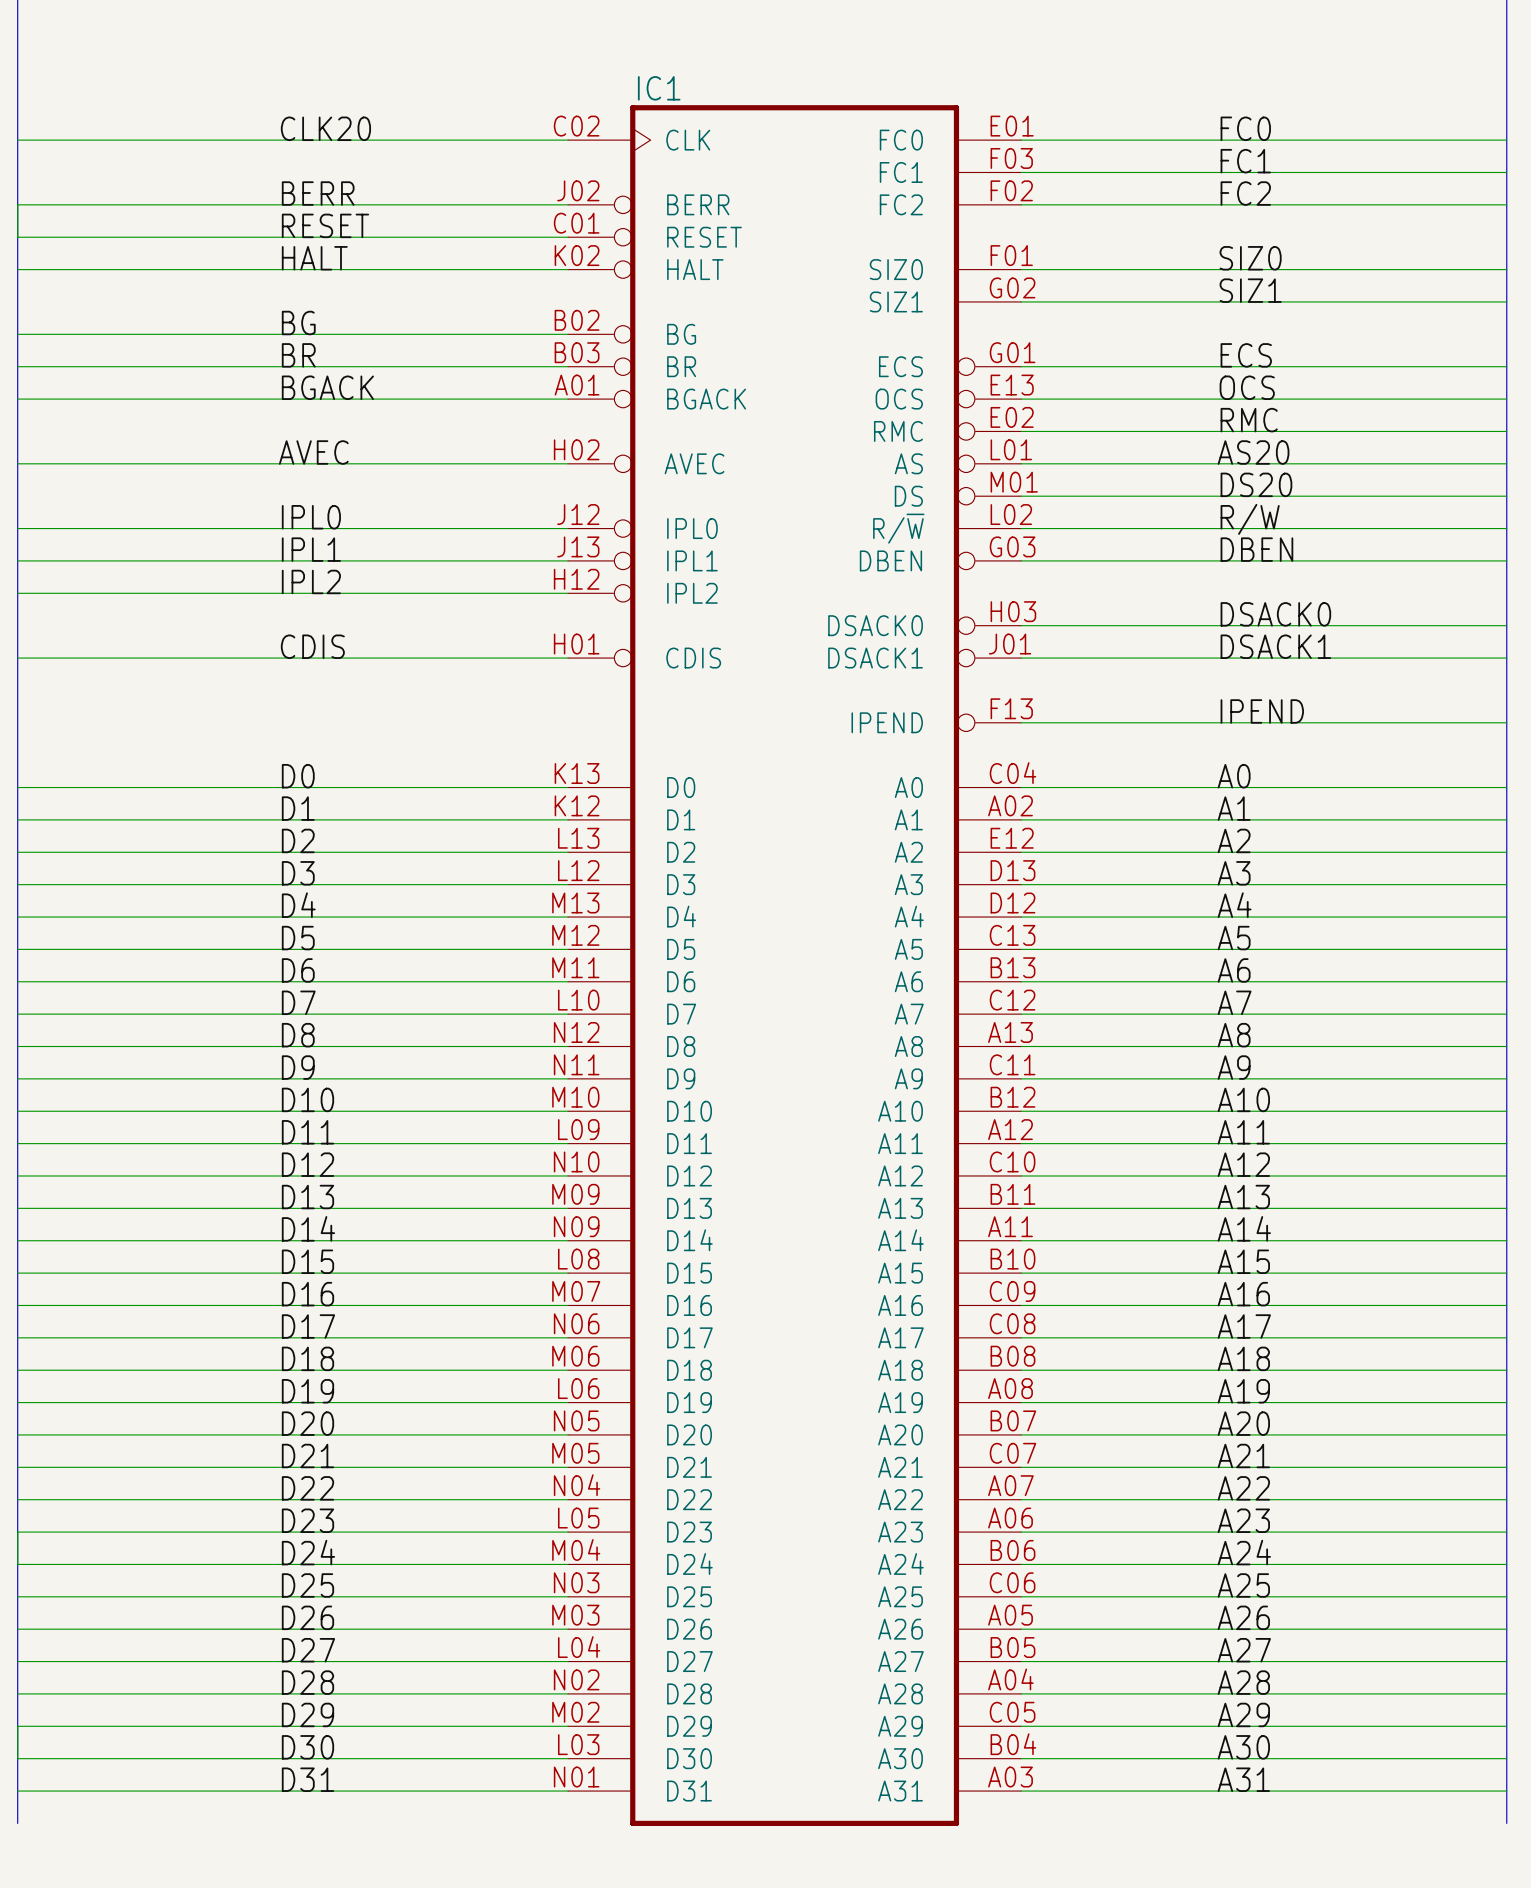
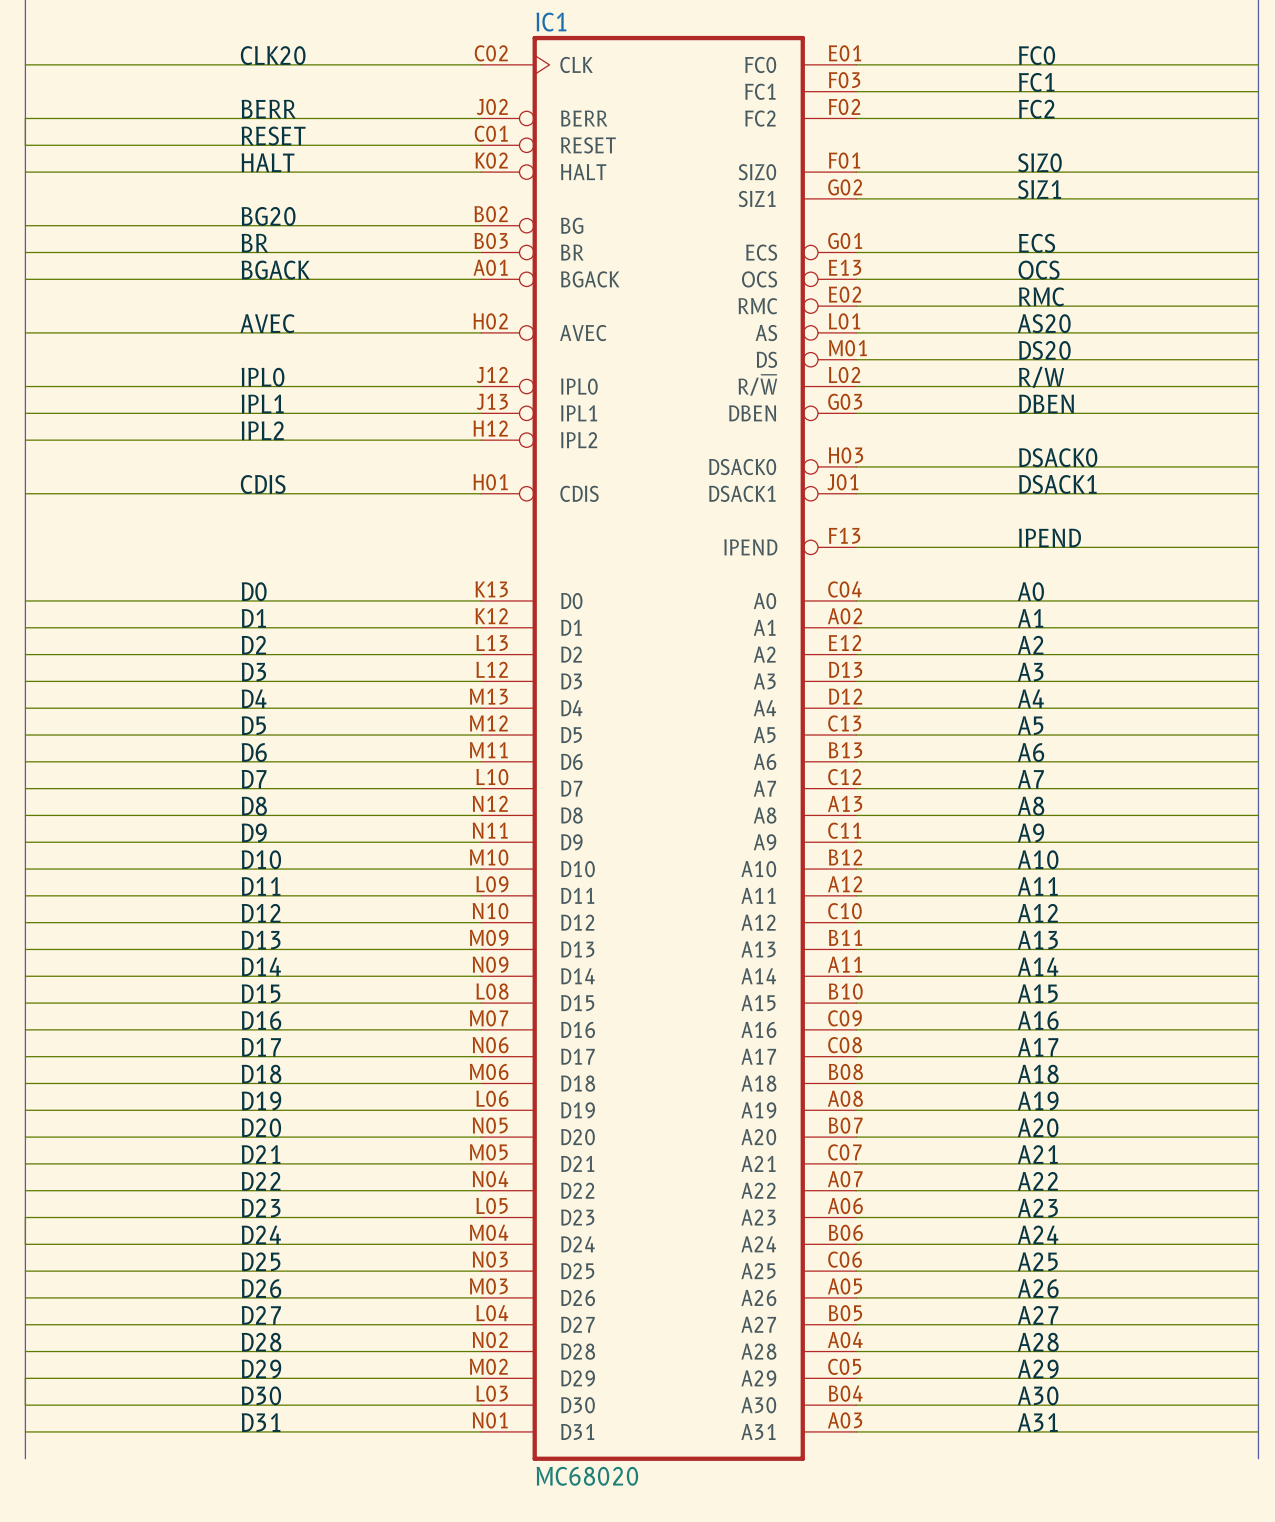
label: BG (298, 323) -> BG20 (268, 216)
IC1 value: none -> MC68020 (587, 1476)

